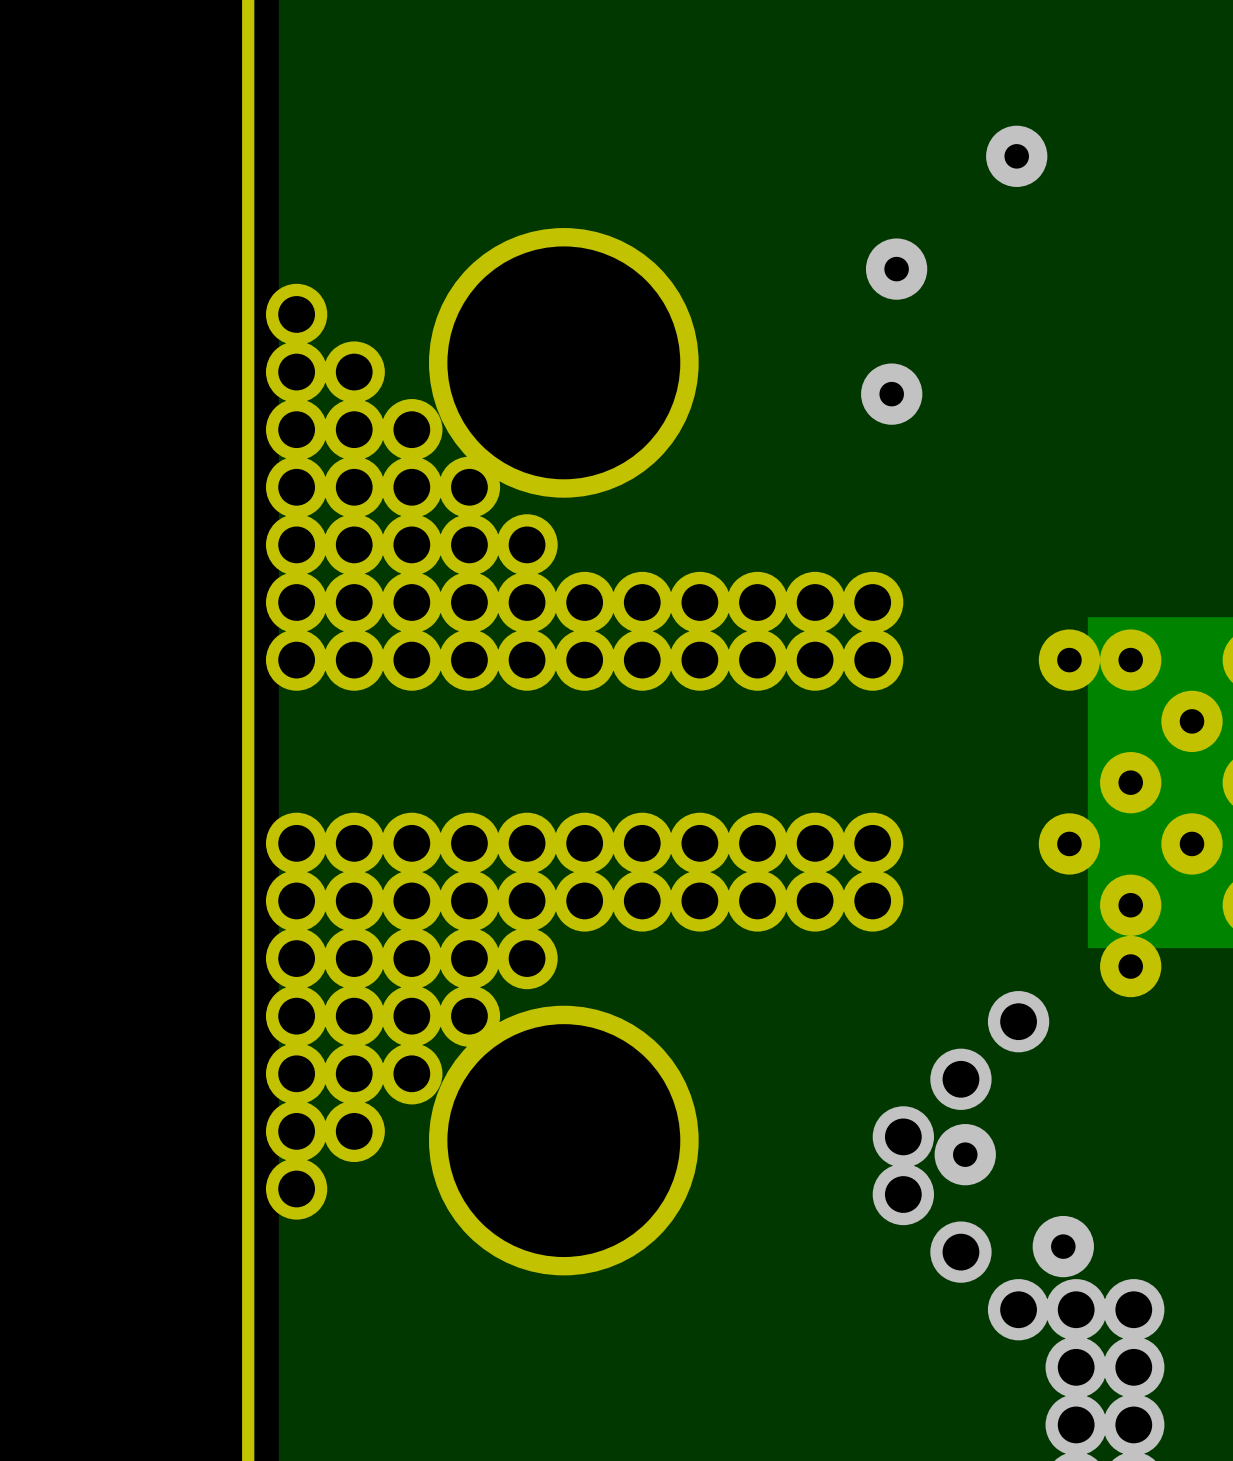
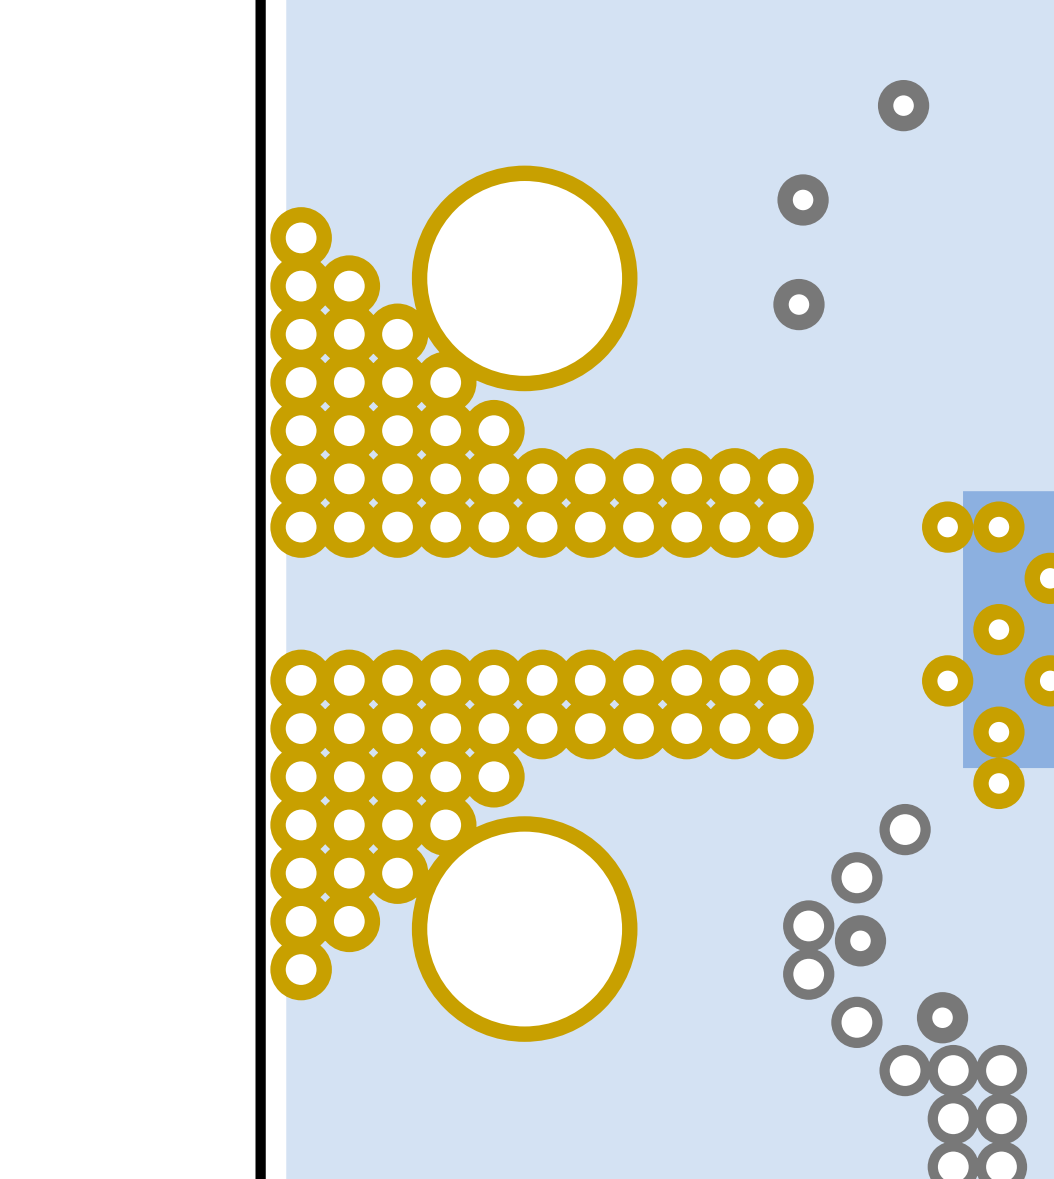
part footprint: [265, 228, 904, 1276] -> [270, 165, 814, 1042]

